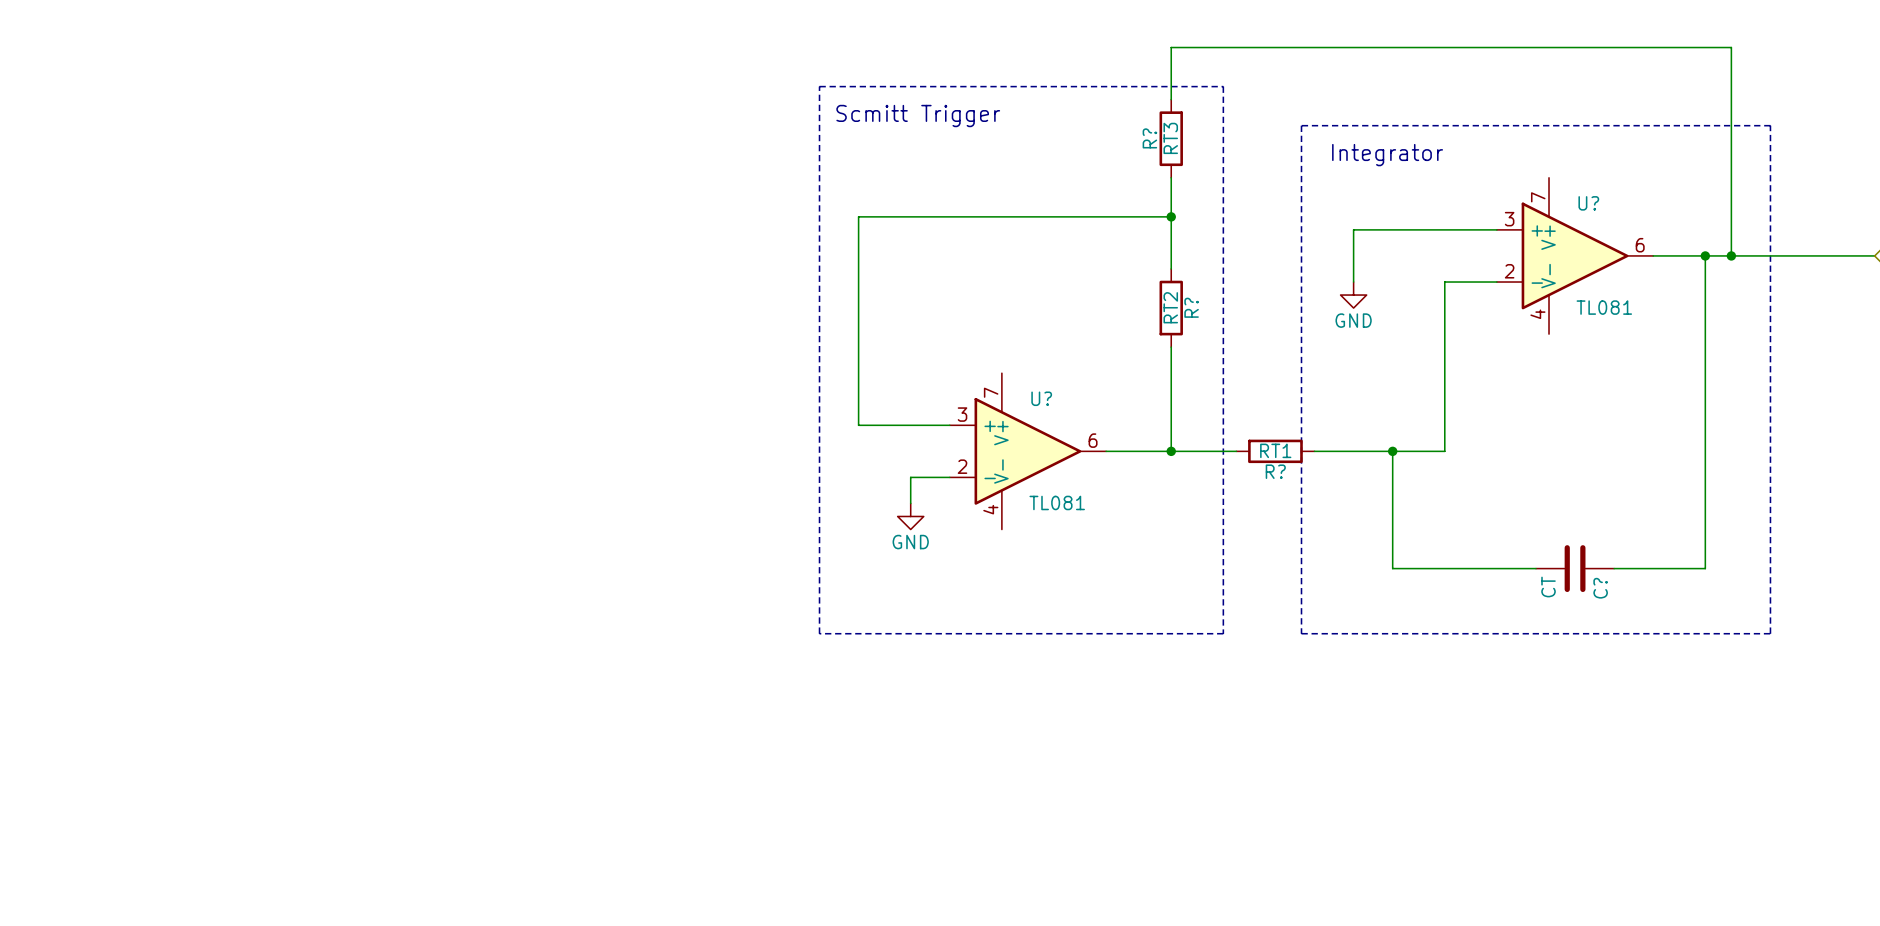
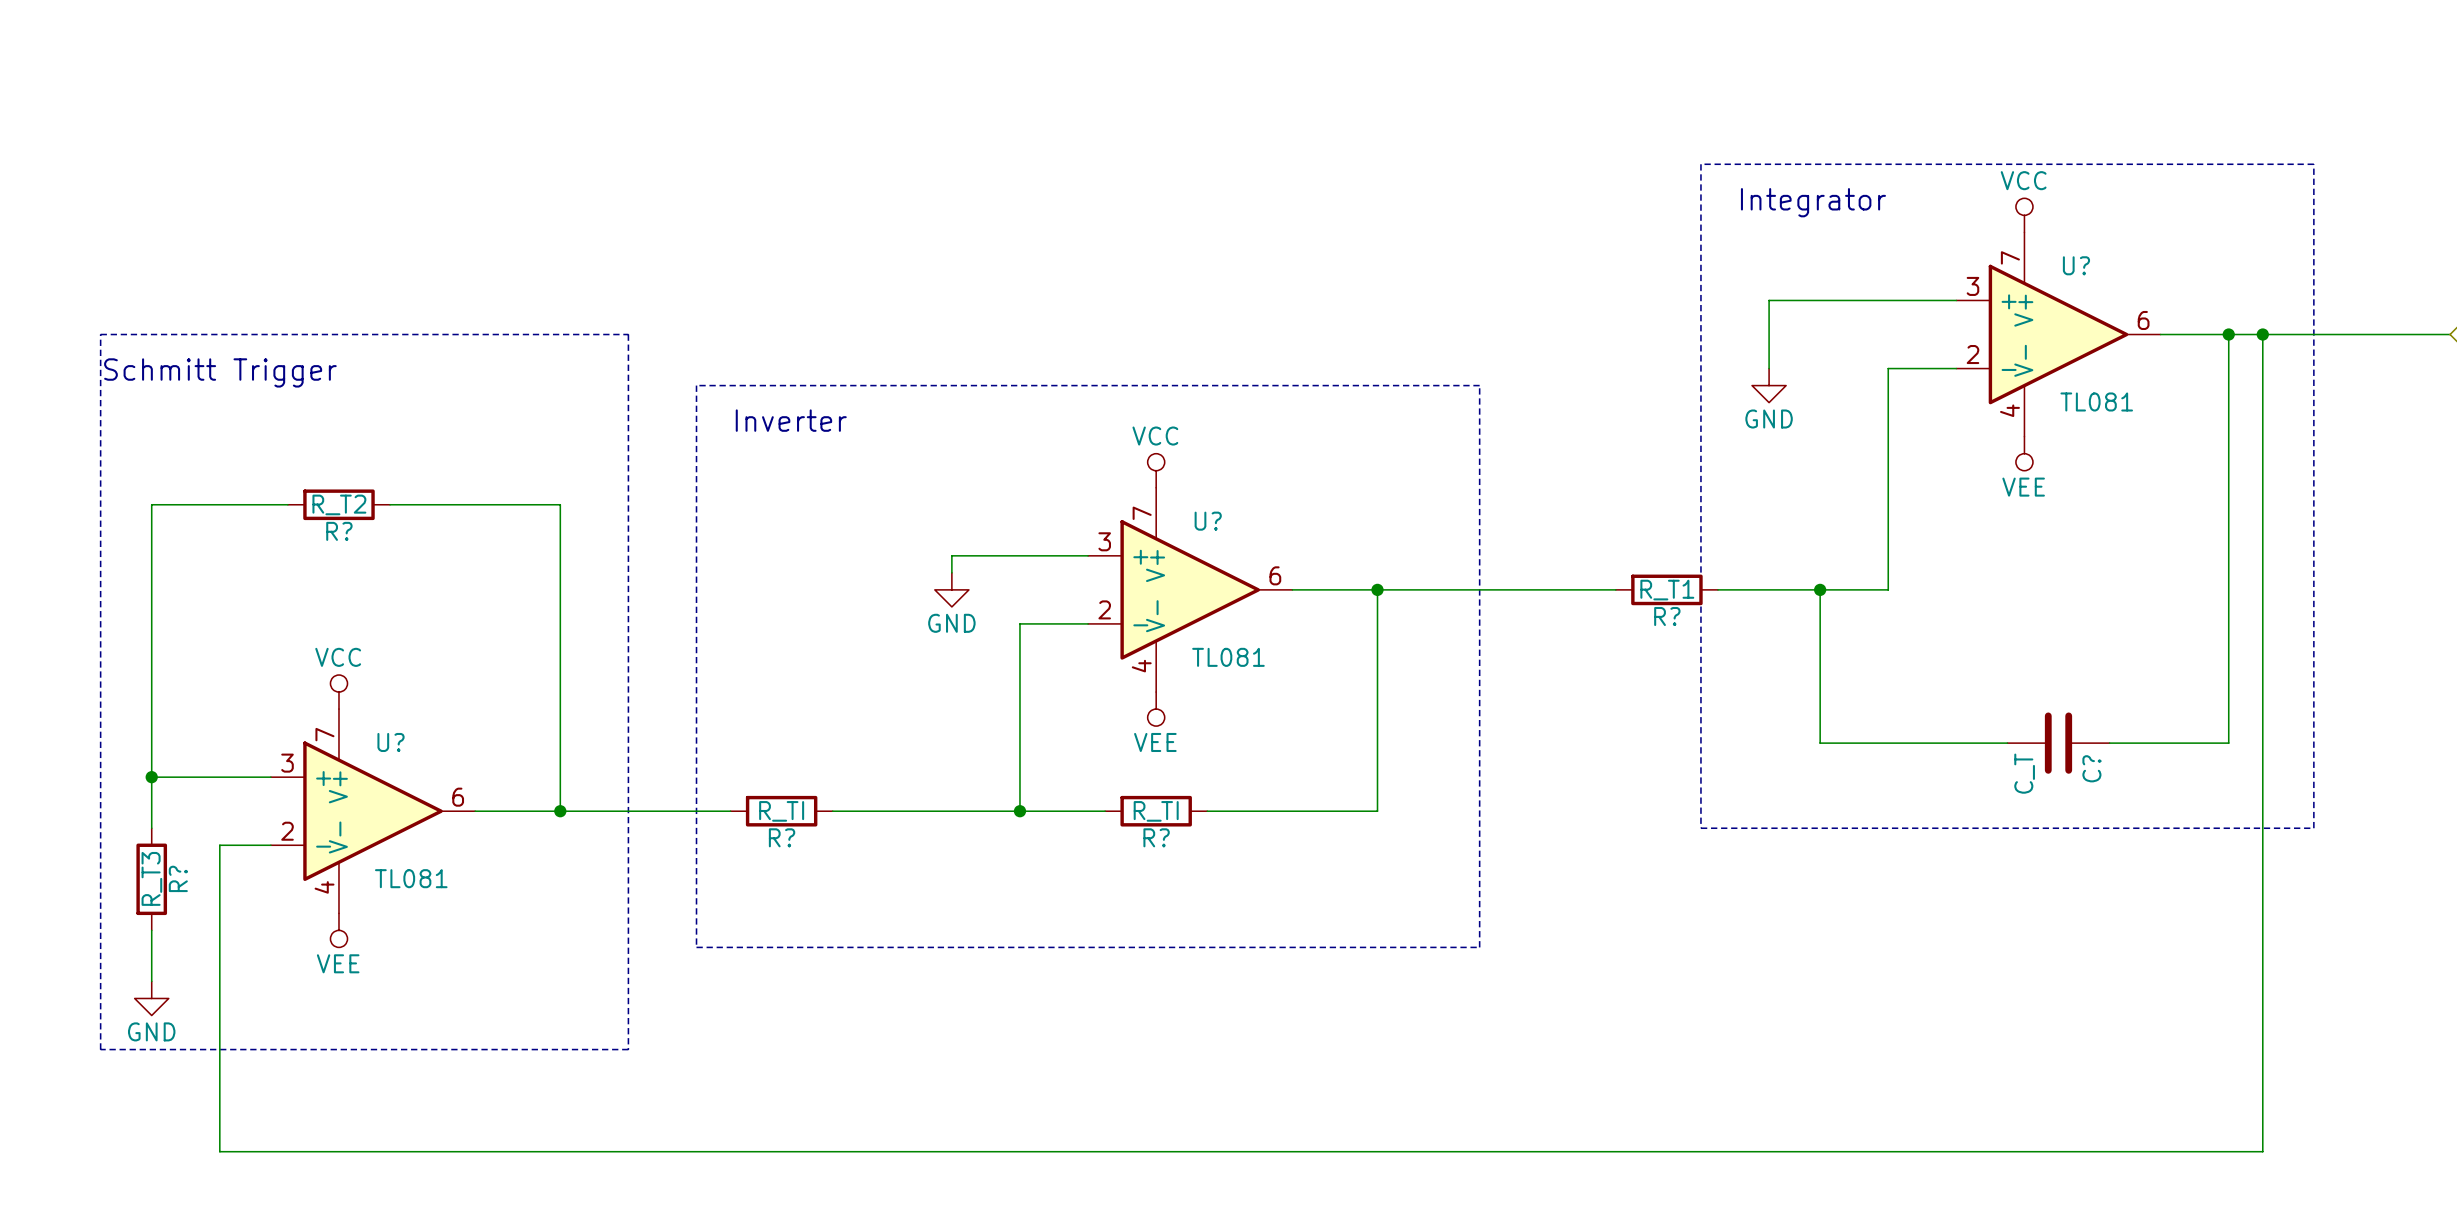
line: (819, 86) (1223, 86) (1223, 633) (819, 633) (819, 86) -> none
wire: (1171, 99) (1171, 47) (1731, 47) (1731, 255) -> (270, 845) (219, 845) (219, 1151) (2262, 1151) (2262, 334)
text: Scmitt Trigger (918, 116) -> none
R?: RT3 (1171, 138) -> none
power symbol: none -> VCC (2024, 215)
wire: (1171, 177) (1171, 268) -> none
wire: (1171, 216) (858, 216) (858, 425) (949, 425) -> none
junction: (1171, 216) -> none
line: none -> (100, 334) (628, 334) (628, 1049) (100, 1049) (100, 334)
text: none -> Schmitt Trigger (220, 372)
line: none -> (696, 385) (696, 947) (1479, 947) (1479, 385) (696, 385)
R?: RT2 (1171, 308) -> none
text: none -> Inverter (791, 420)
wire: (1171, 347) (1171, 451) -> none
power symbol: none -> VEE (2024, 453)
power symbol: none -> VCC (1156, 470)
wire: none -> (287, 504) (151, 504) (151, 828)
R?: none -> R_T2 (338, 504)
wire: none -> (390, 504) (560, 504) (560, 811)
wire: none -> (1088, 555) (951, 555) (951, 572)
R? value: RT1 (1275, 450) -> R_T1 (1667, 590)
U? position: (1027, 451) -> (1190, 589)
wire: none -> (1377, 589) (1377, 811) (1207, 811)
junction: none -> (1377, 589)
junction: (1171, 451) -> none
wire: none -> (1088, 623) (1019, 623) (1019, 811)
wire: (949, 477) (910, 477) (910, 503) -> none
power symbol position: GND (910, 516) -> GND (951, 589)
power symbol: none -> VCC (338, 692)
power symbol: none -> VEE (1156, 709)
C? value: CT (1548, 586) -> C_T (2024, 773)
wire: none -> (151, 777) (270, 777)
junction: none -> (151, 777)
U?: none -> TL081 (373, 811)
wire: none -> (475, 811) (730, 811)
junction: none -> (560, 811)
R?: none -> R_TI (781, 811)
wire: none -> (832, 811) (1105, 811)
junction: none -> (1019, 811)
R?: none -> R_TI (1156, 811)
R?: none -> R_T3 (151, 879)
wire: none -> (151, 930) (151, 981)
power symbol: none -> VEE (338, 930)
power symbol: none -> GND (151, 998)

